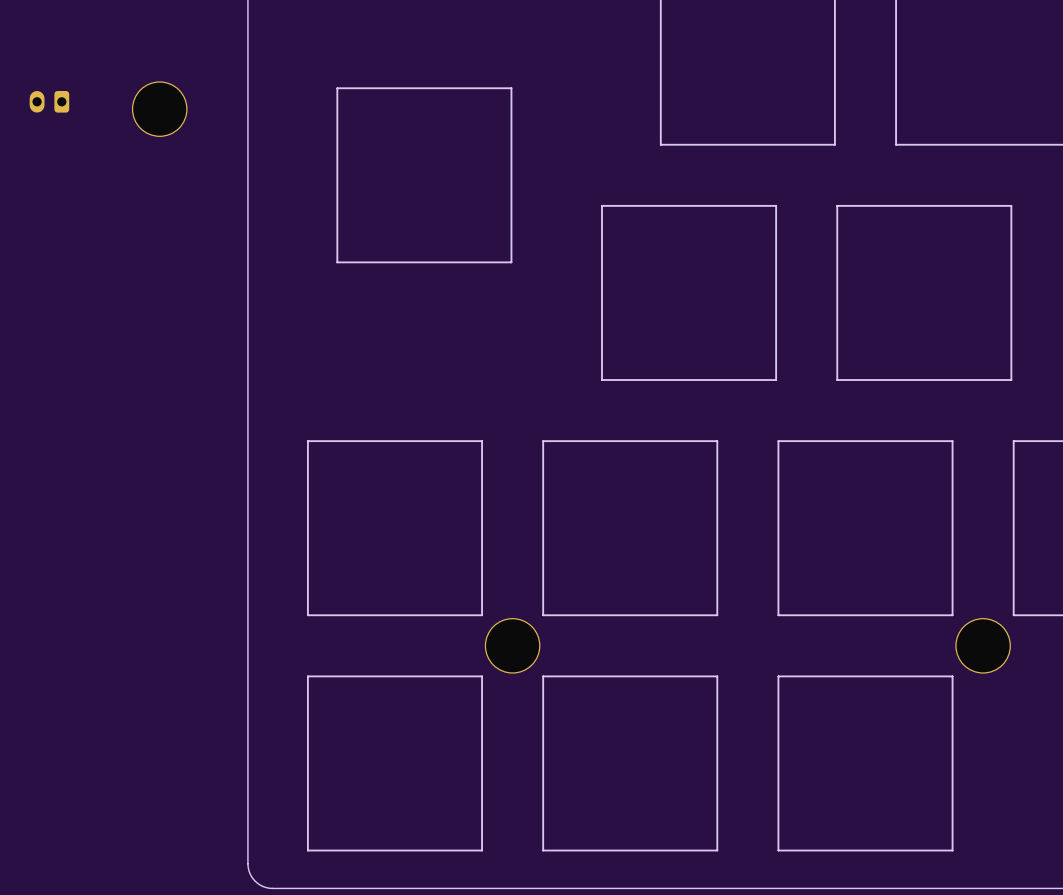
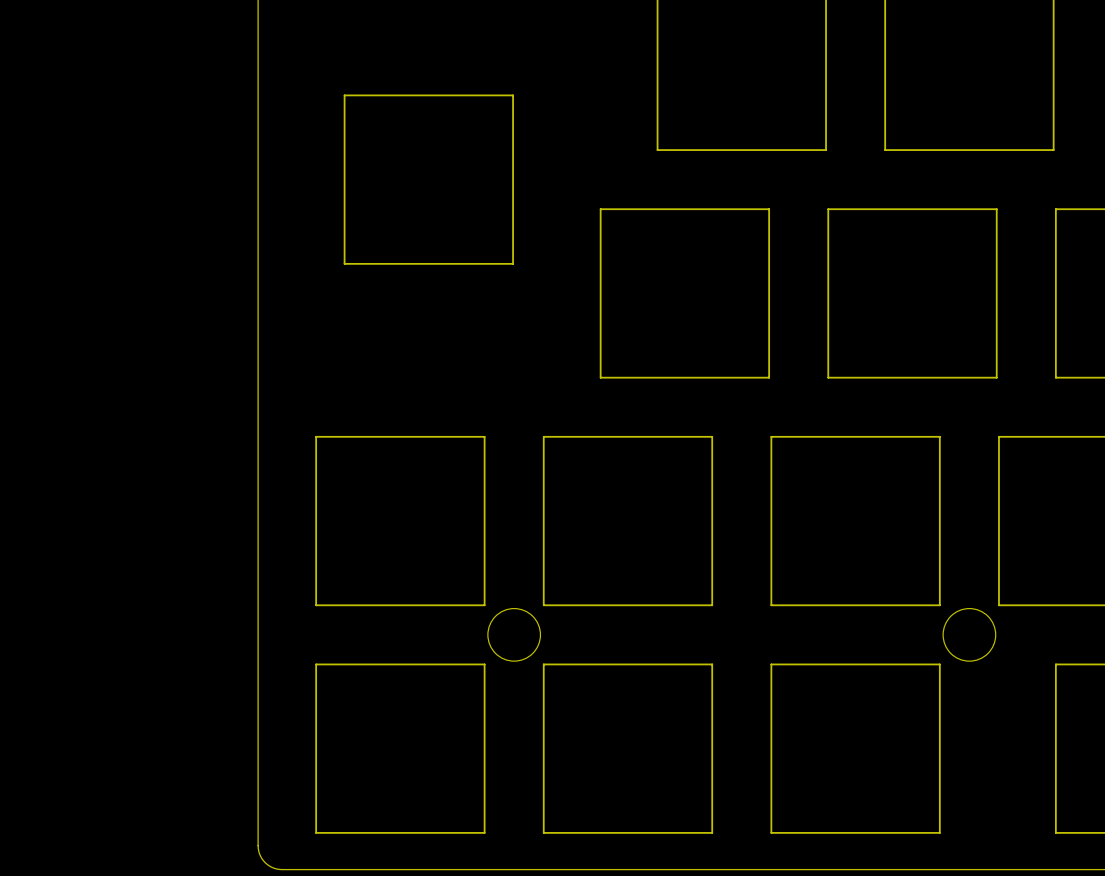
part: (49, 101) -> none
part: (159, 109) -> none

